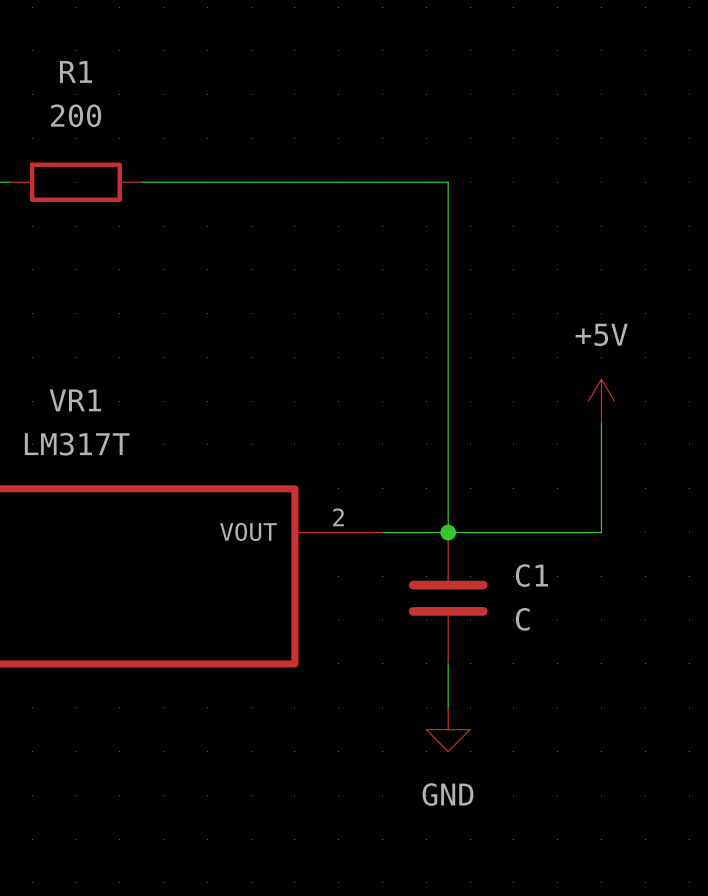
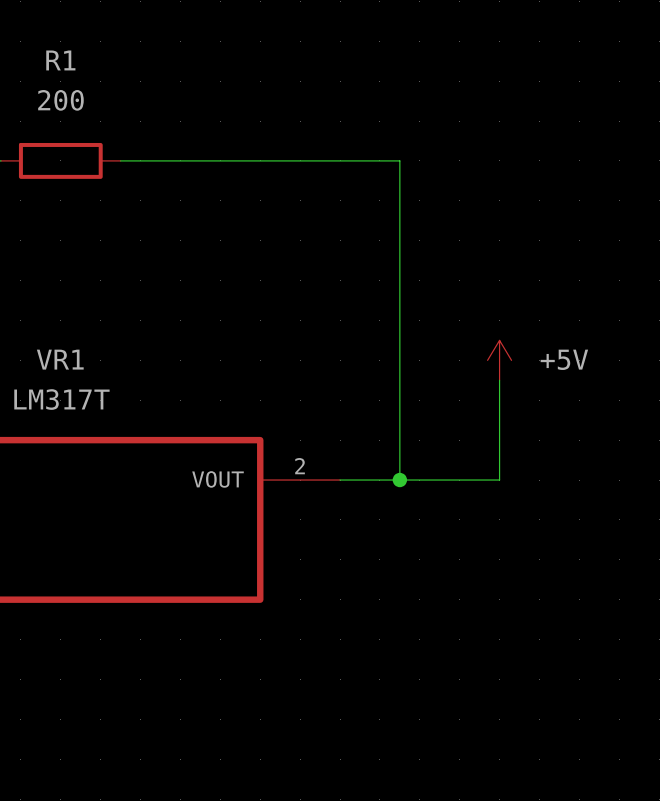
power symbol text position: +5V (601, 334) -> +5V (564, 359)
power symbol position: +5V (601, 401) -> +5V (499, 360)
wire: (601, 423) (601, 532) (557, 532) -> (499, 380) (499, 480)
C1: C (448, 598) -> none
wire: (448, 663) (448, 707) -> none
power symbol: GND (448, 729) -> none

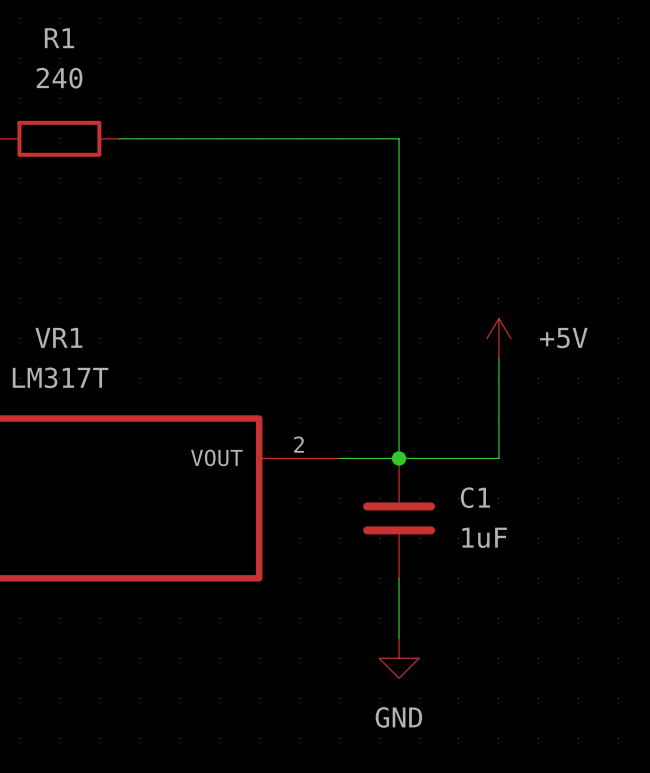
R1 value: 200 (60, 100) -> 240 (59, 78)
C1: none -> 1uF (399, 518)
wire: none -> (399, 578) (399, 638)
power symbol: none -> GND (399, 658)

